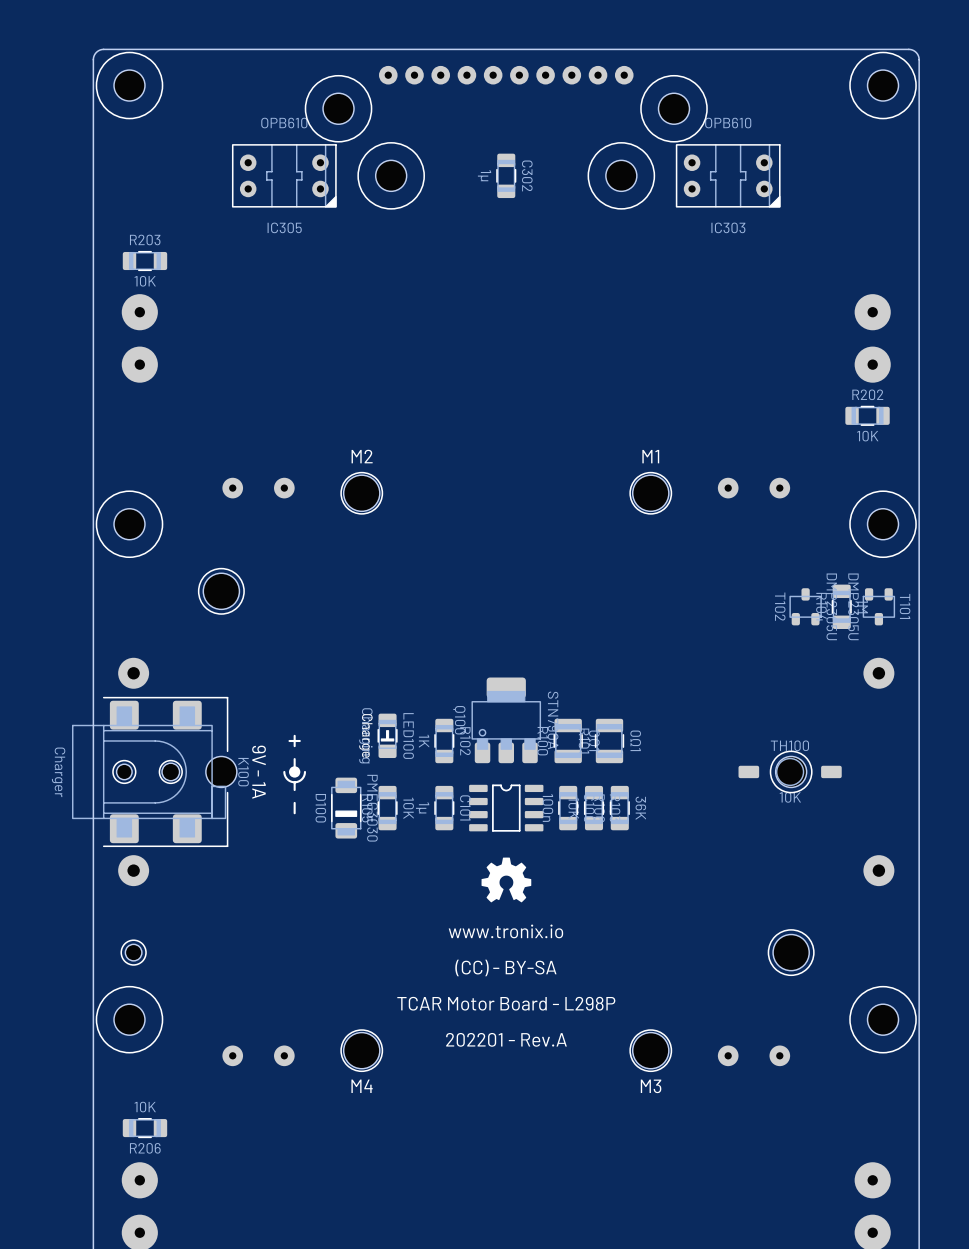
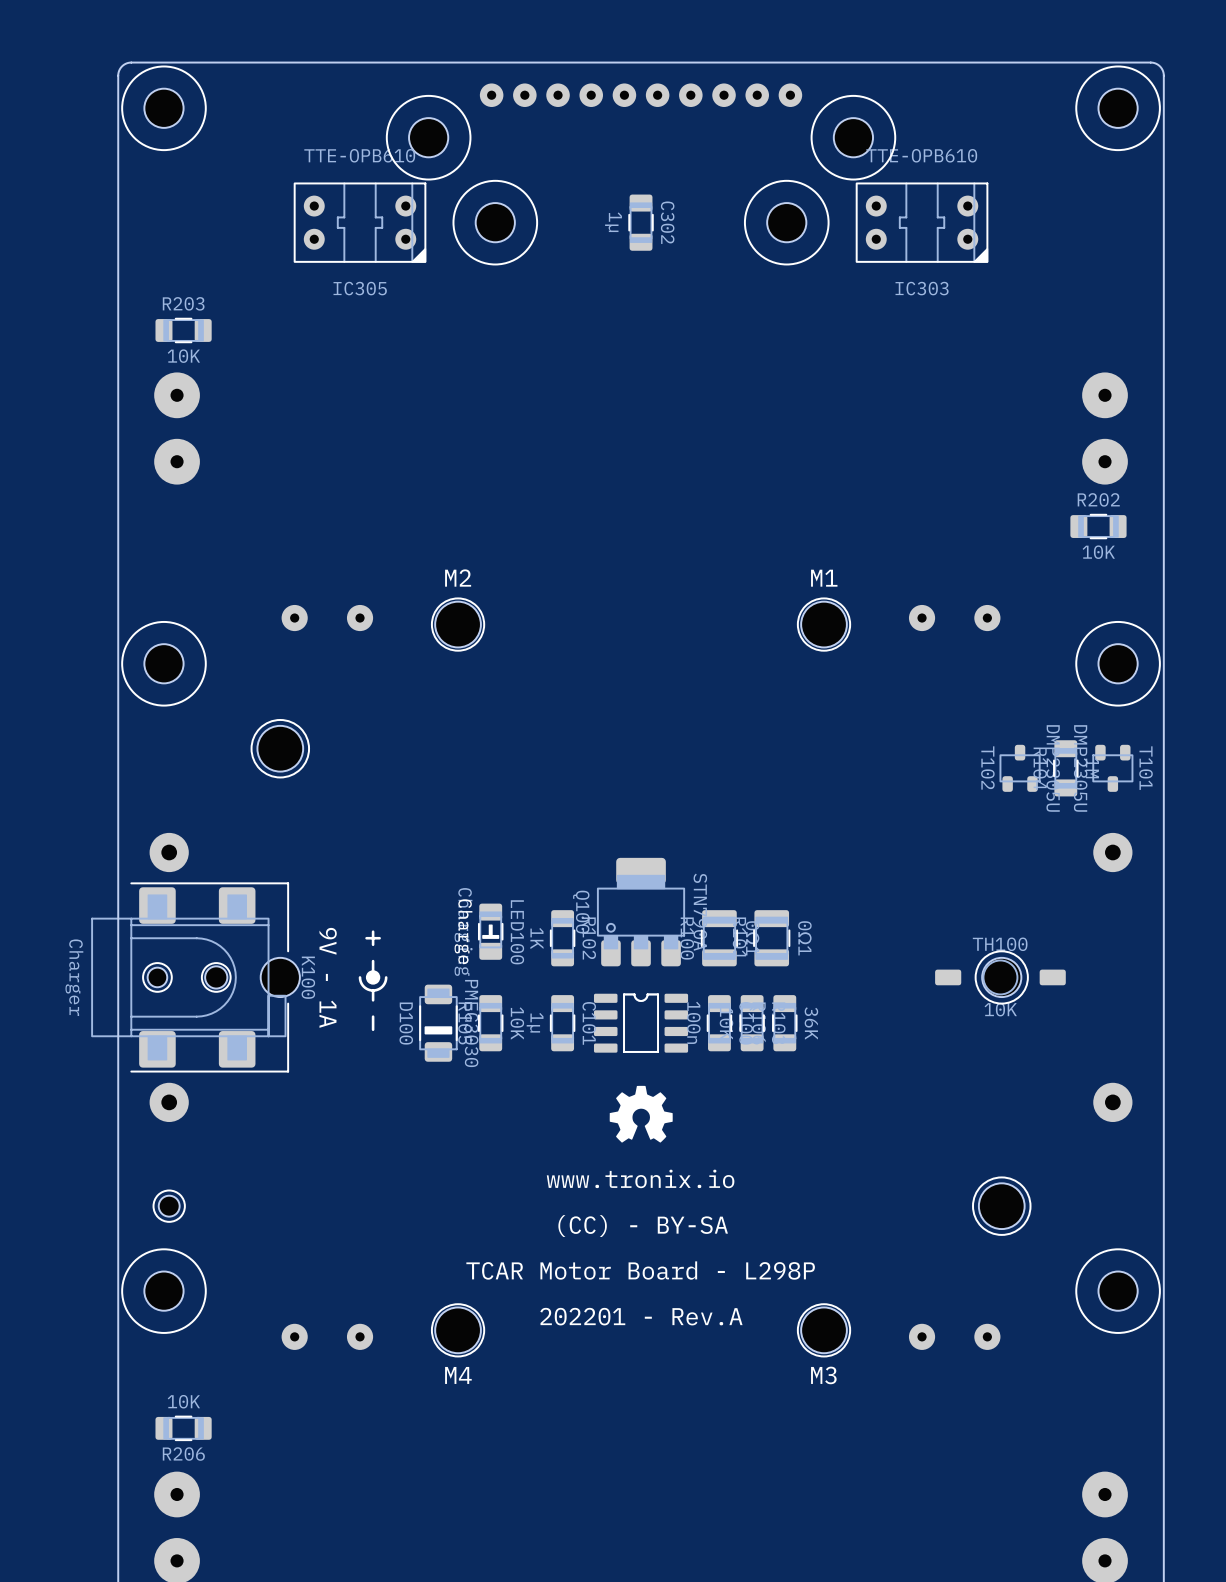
IC305 value: OPB610 (284, 123) -> TTE-OPB610 (359, 155)
IC303 value: OPB610 (728, 123) -> TTE-OPB610 (921, 155)

